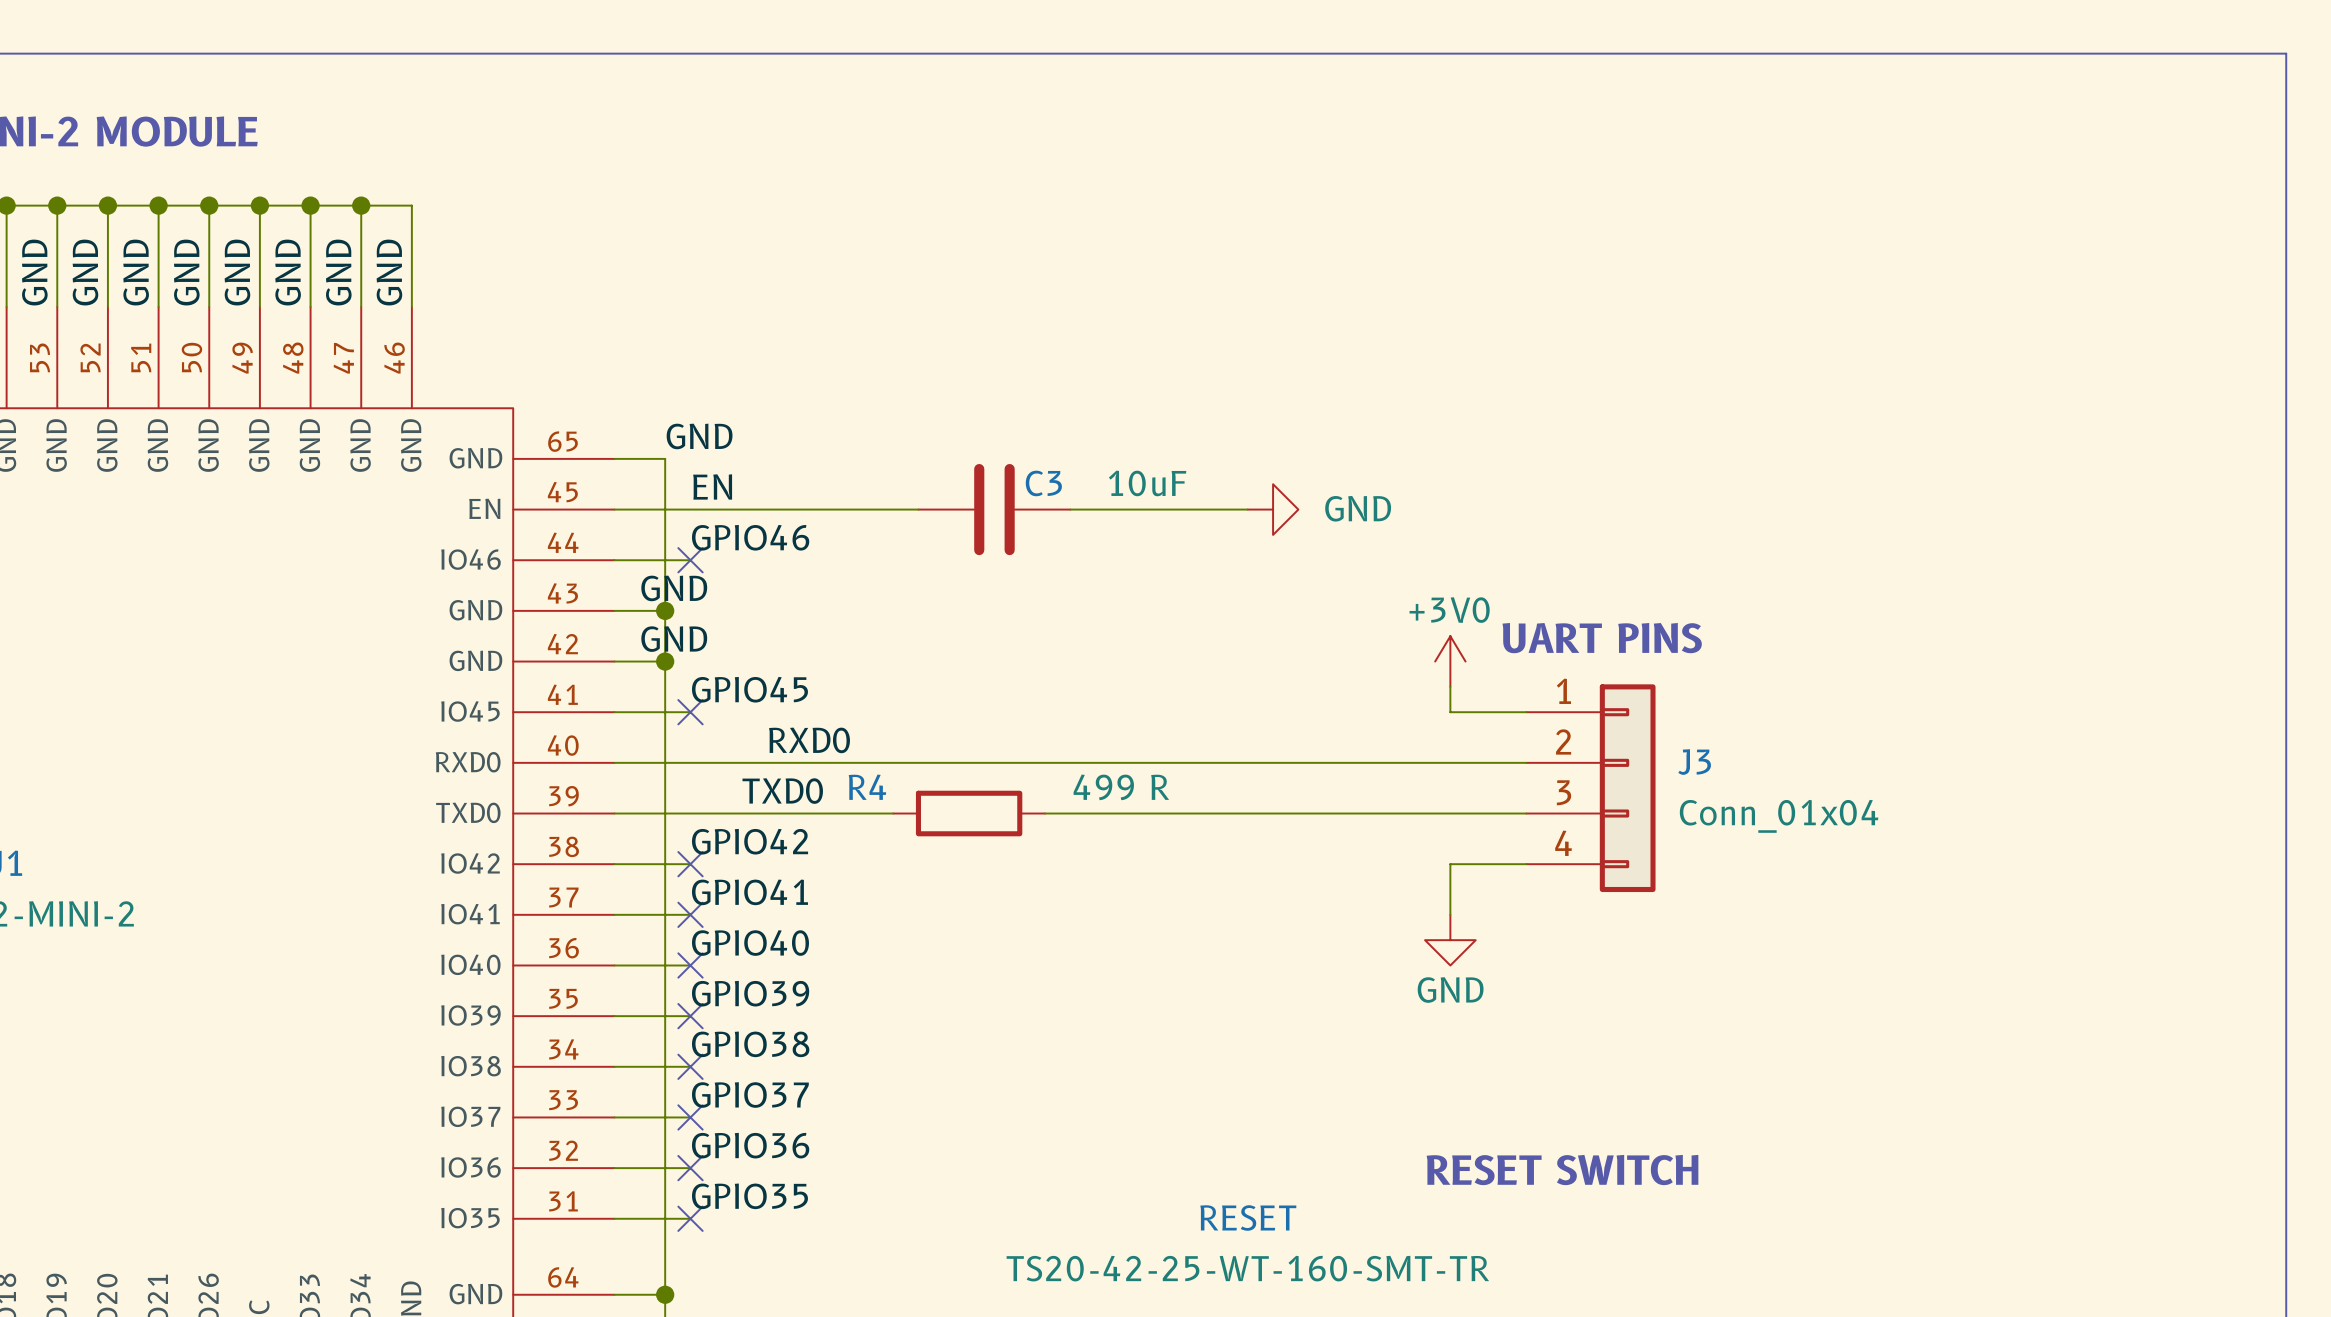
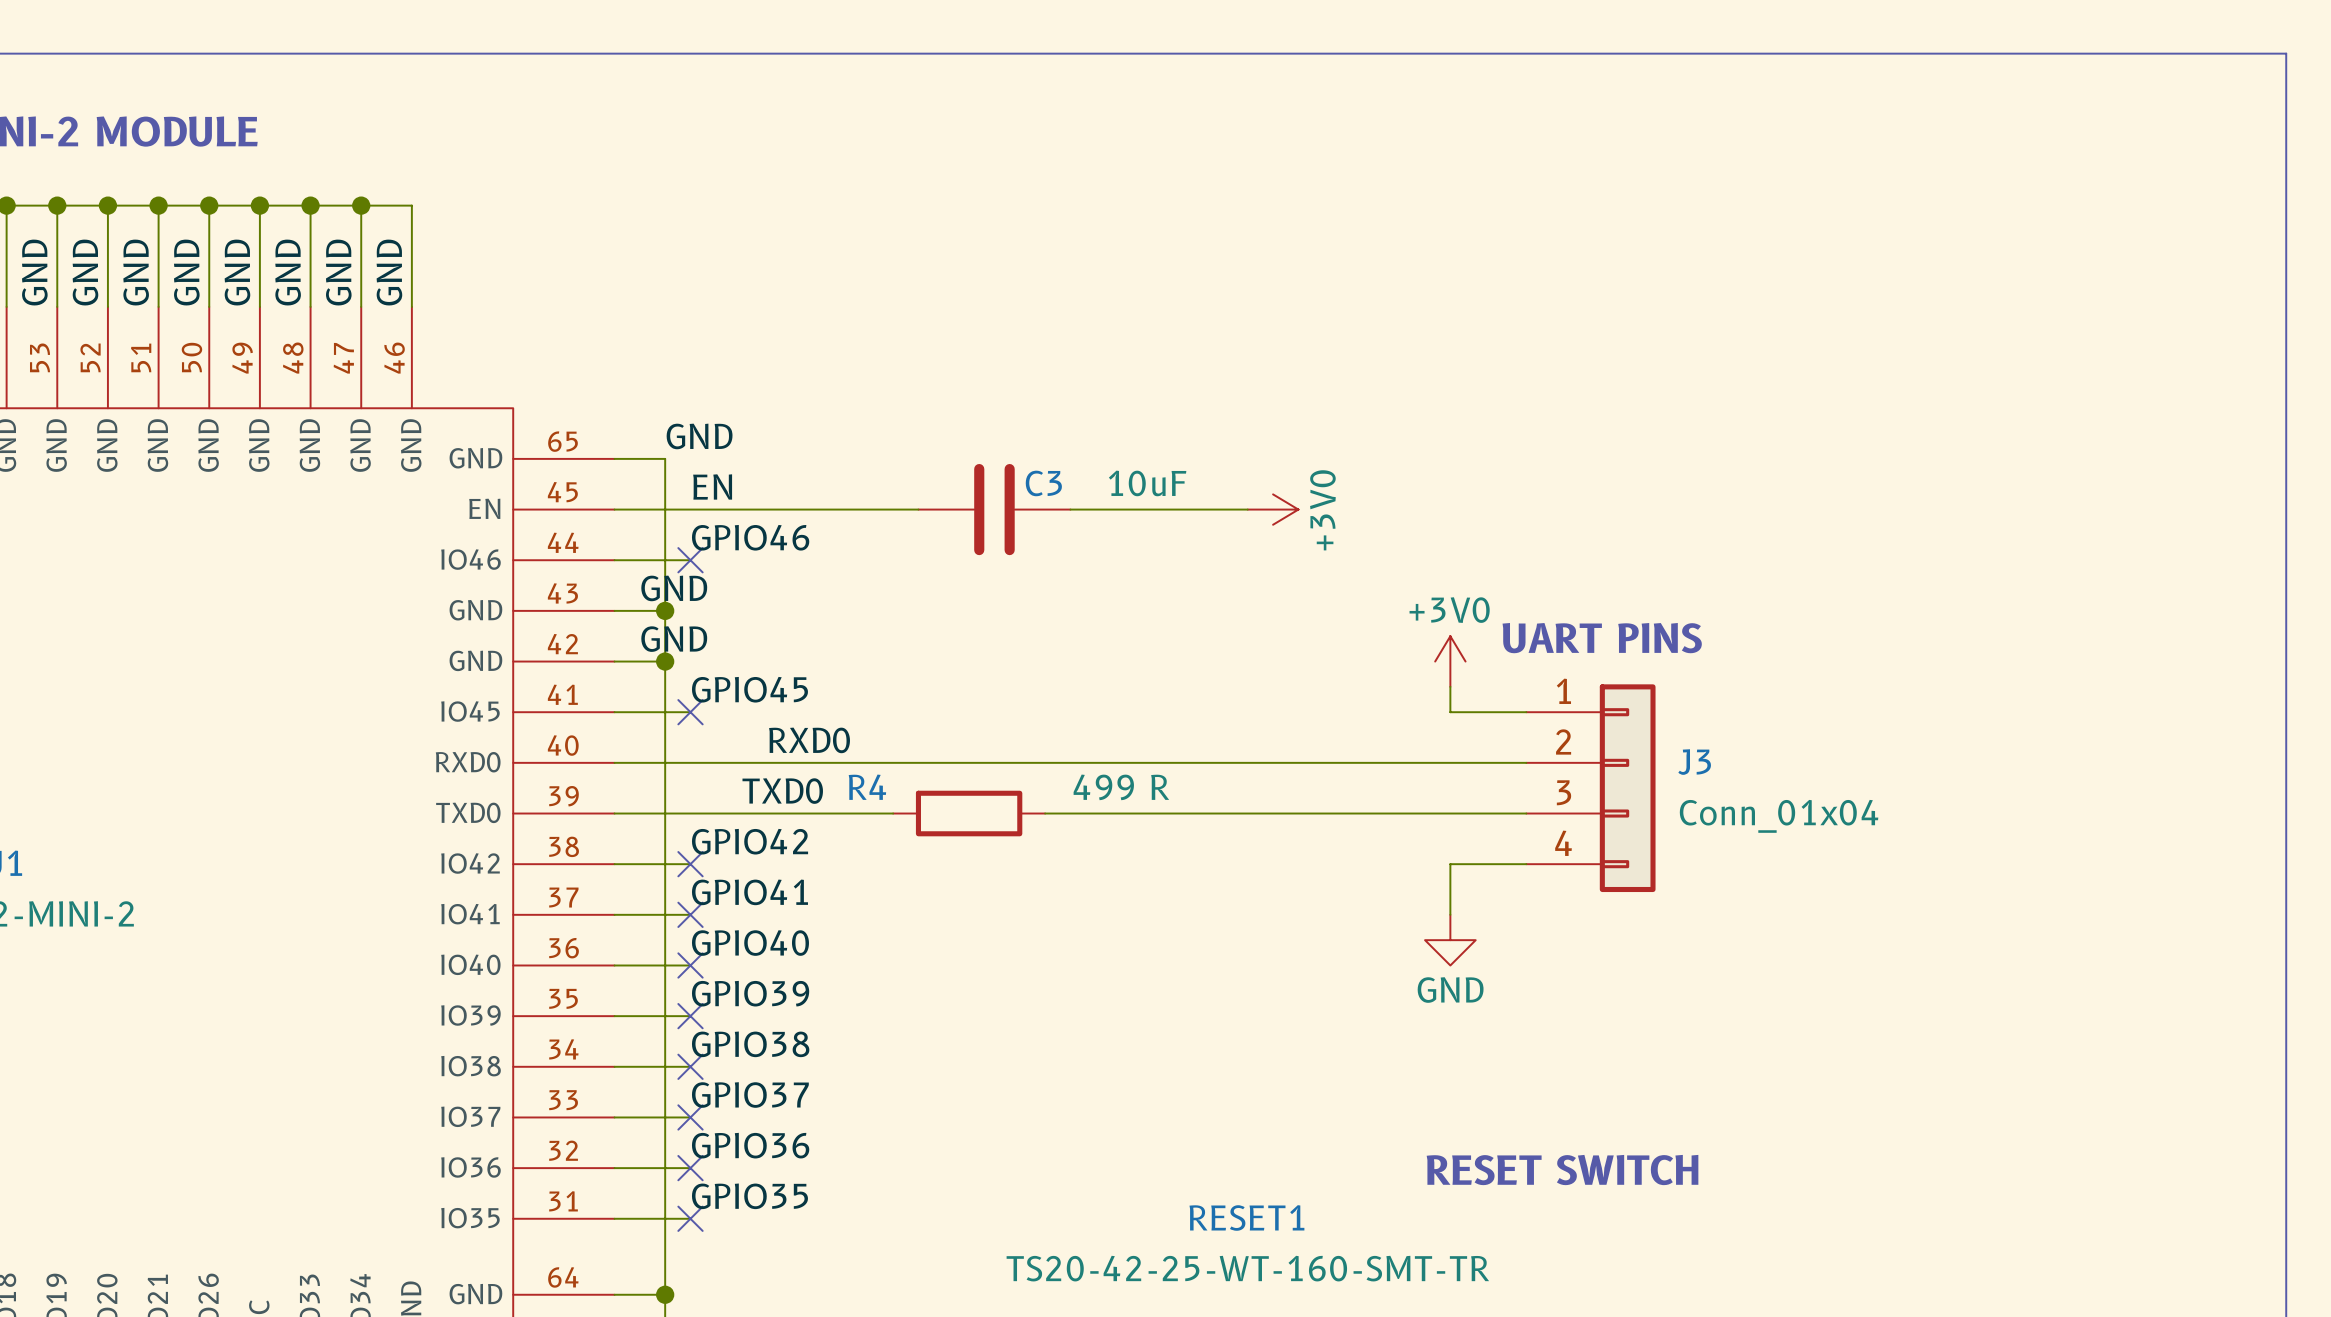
power symbol: GND (1273, 509) -> +3V0 (1273, 509)
RESET name: RESET (1248, 1218) -> RESET1 (1246, 1217)

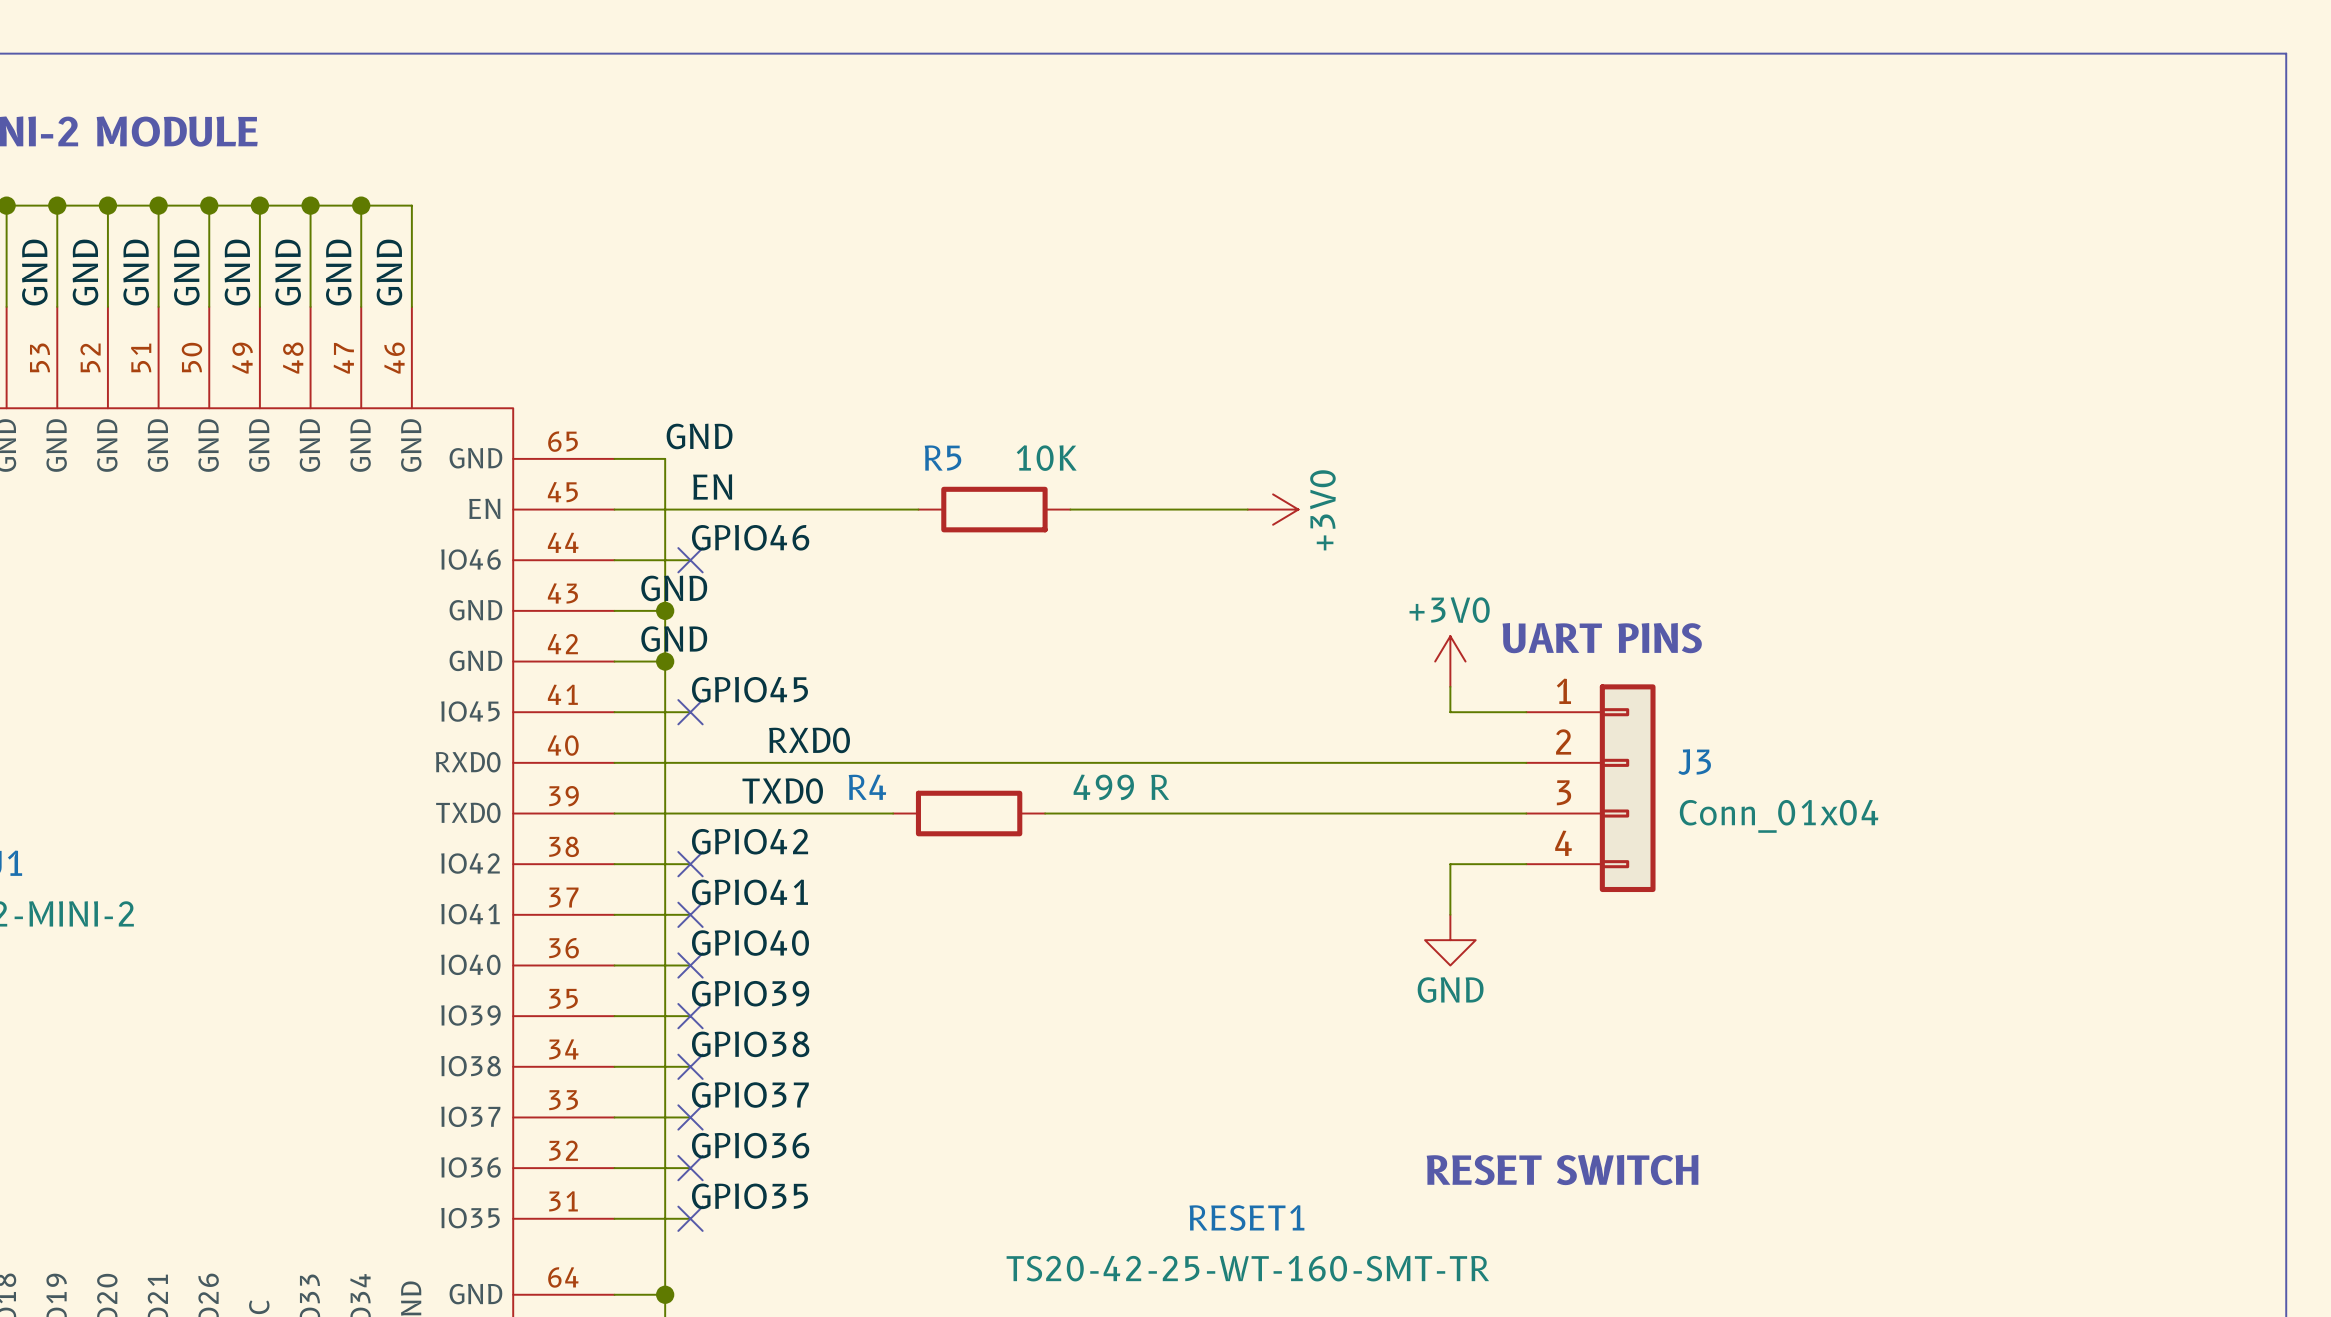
C3: 10uF (994, 509) -> none
R5: none -> 10K (994, 509)

